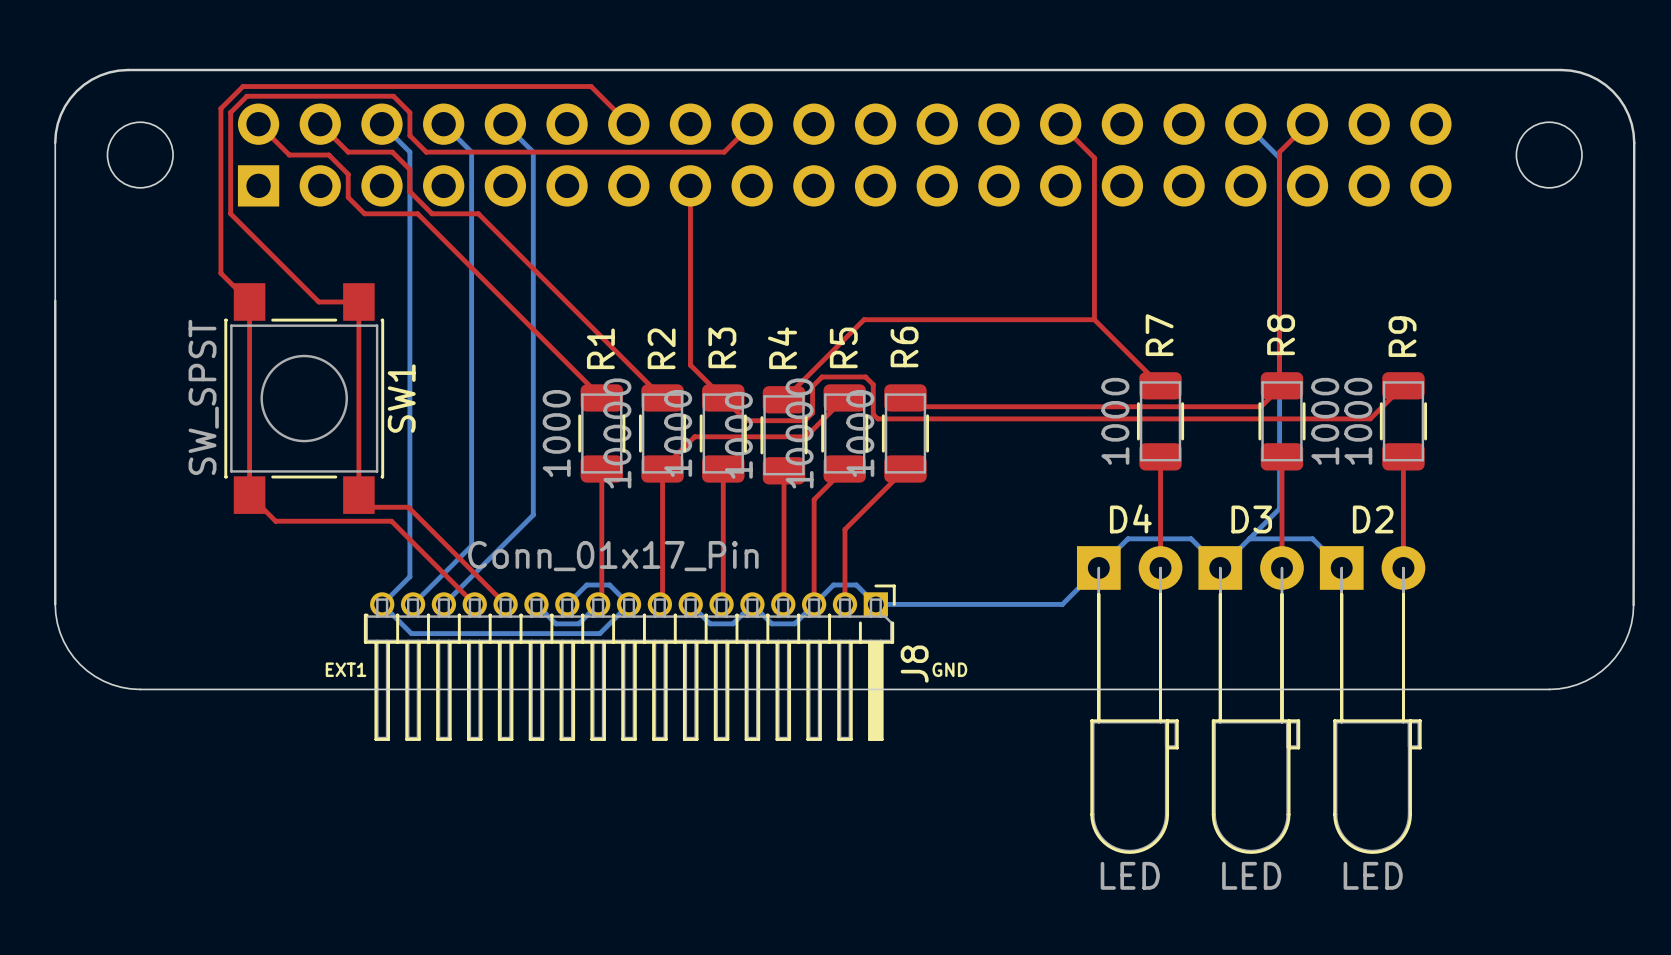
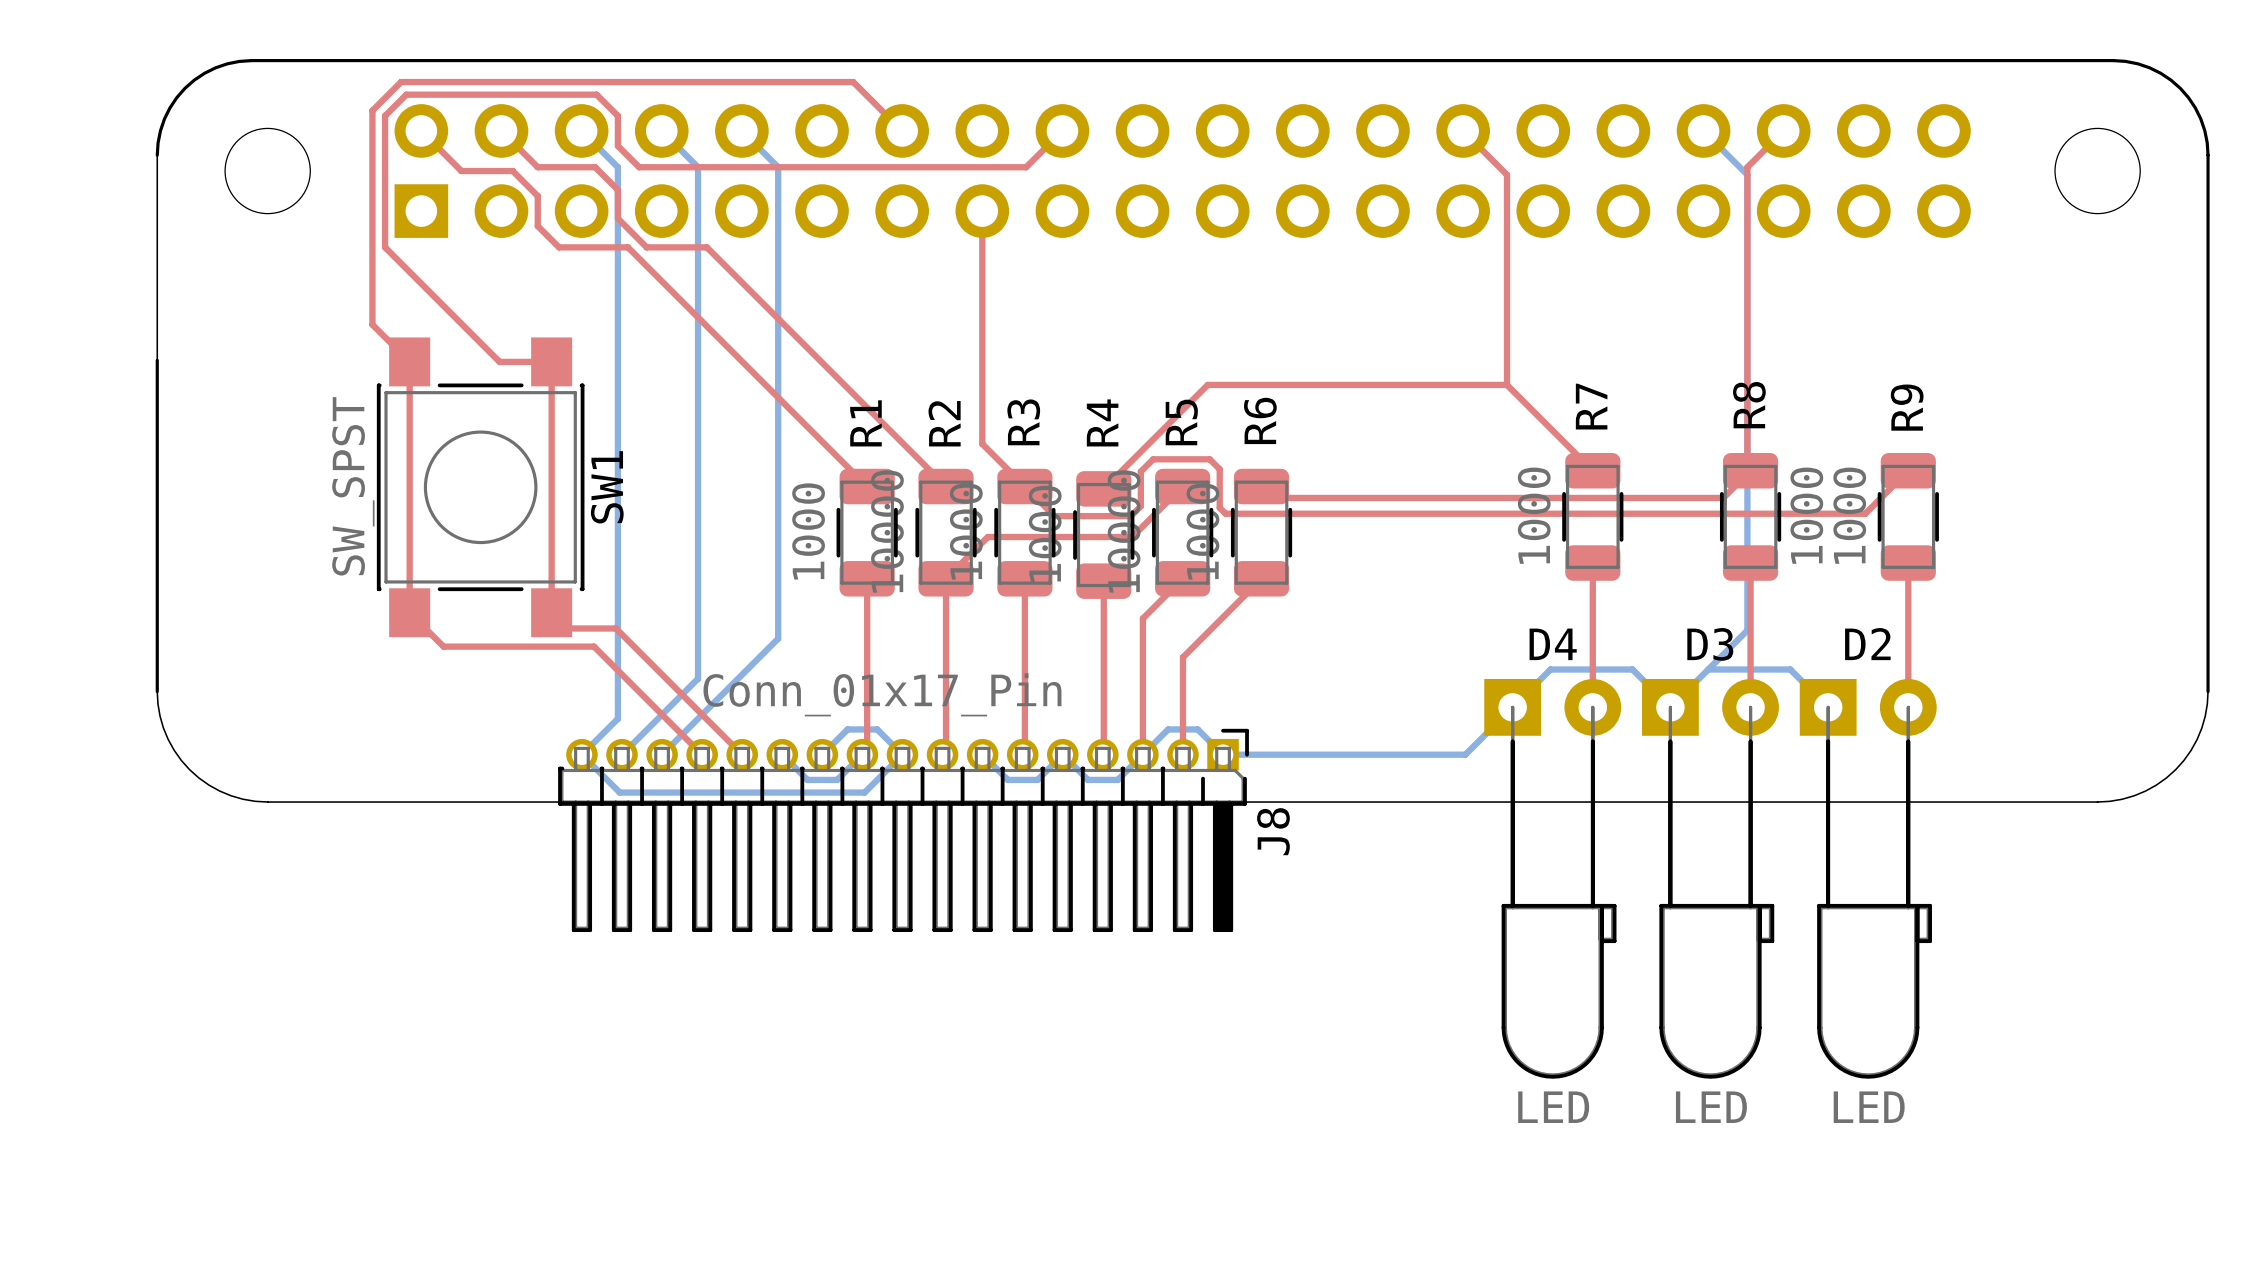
board edge: (1634, 142) (1633, 614) (1625, 641) (1608, 664) (1594, 676) (1567, 687) (1549, 689) (130, 688) (112, 684) (95, 676) (80, 664) (68, 649) (60, 632) (55, 613) (55, 555) -> (2208, 155) (2207, 703) (2197, 739) (2183, 760) (2156, 785) (2122, 799) (2097, 802) (267, 802) (243, 799) (219, 791) (189, 769) (168, 739) (160, 716) (157, 691)
text: EXT1 (346, 669) -> none
text: GND (949, 669) -> none

